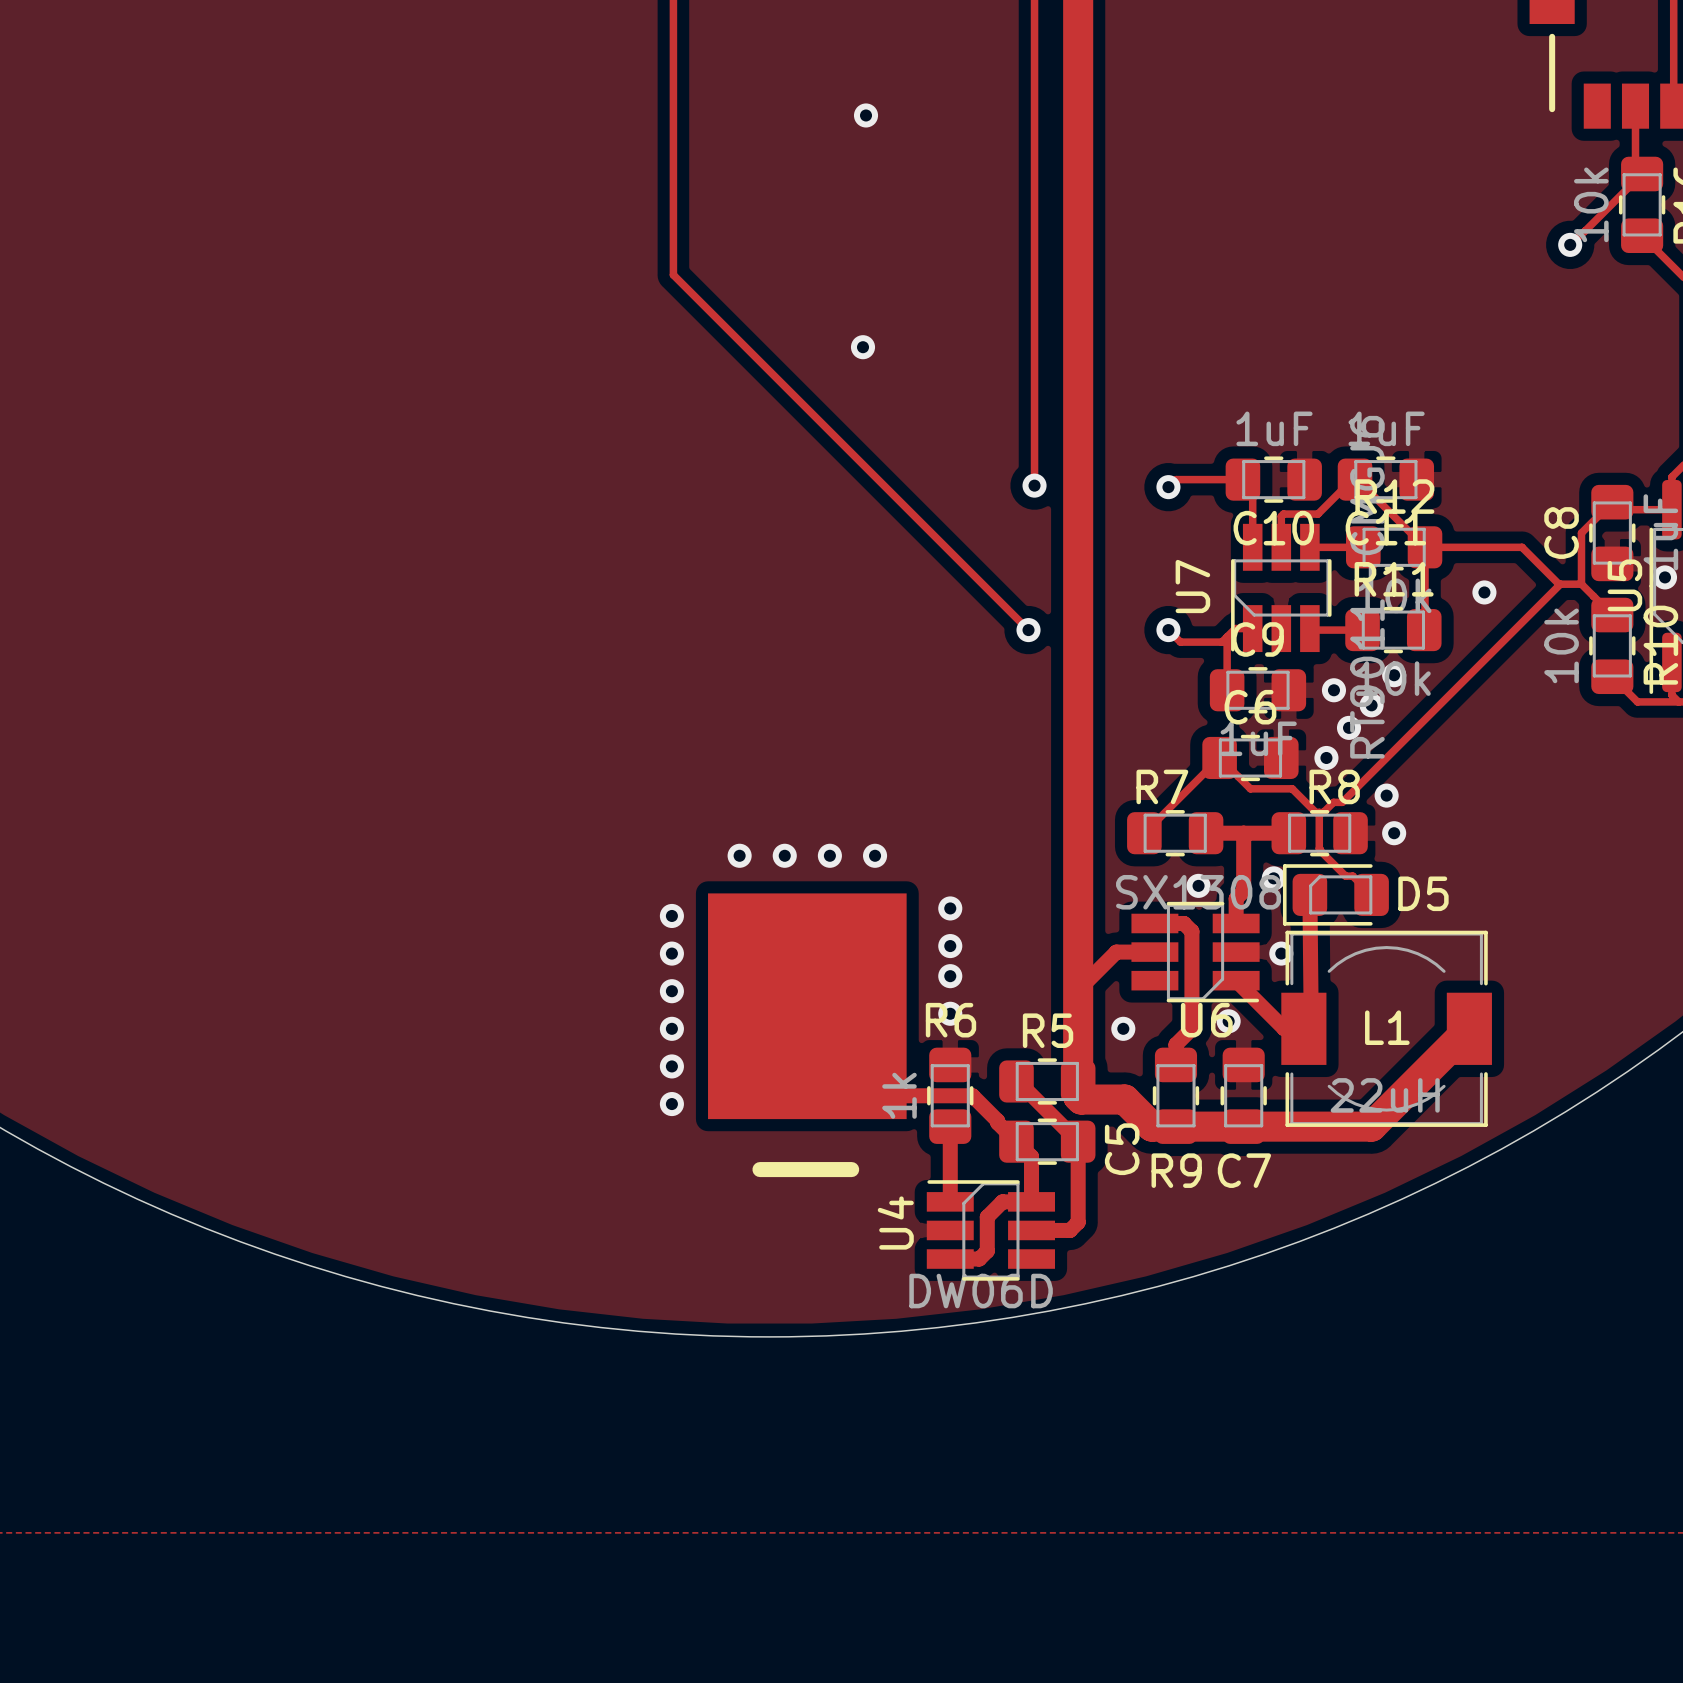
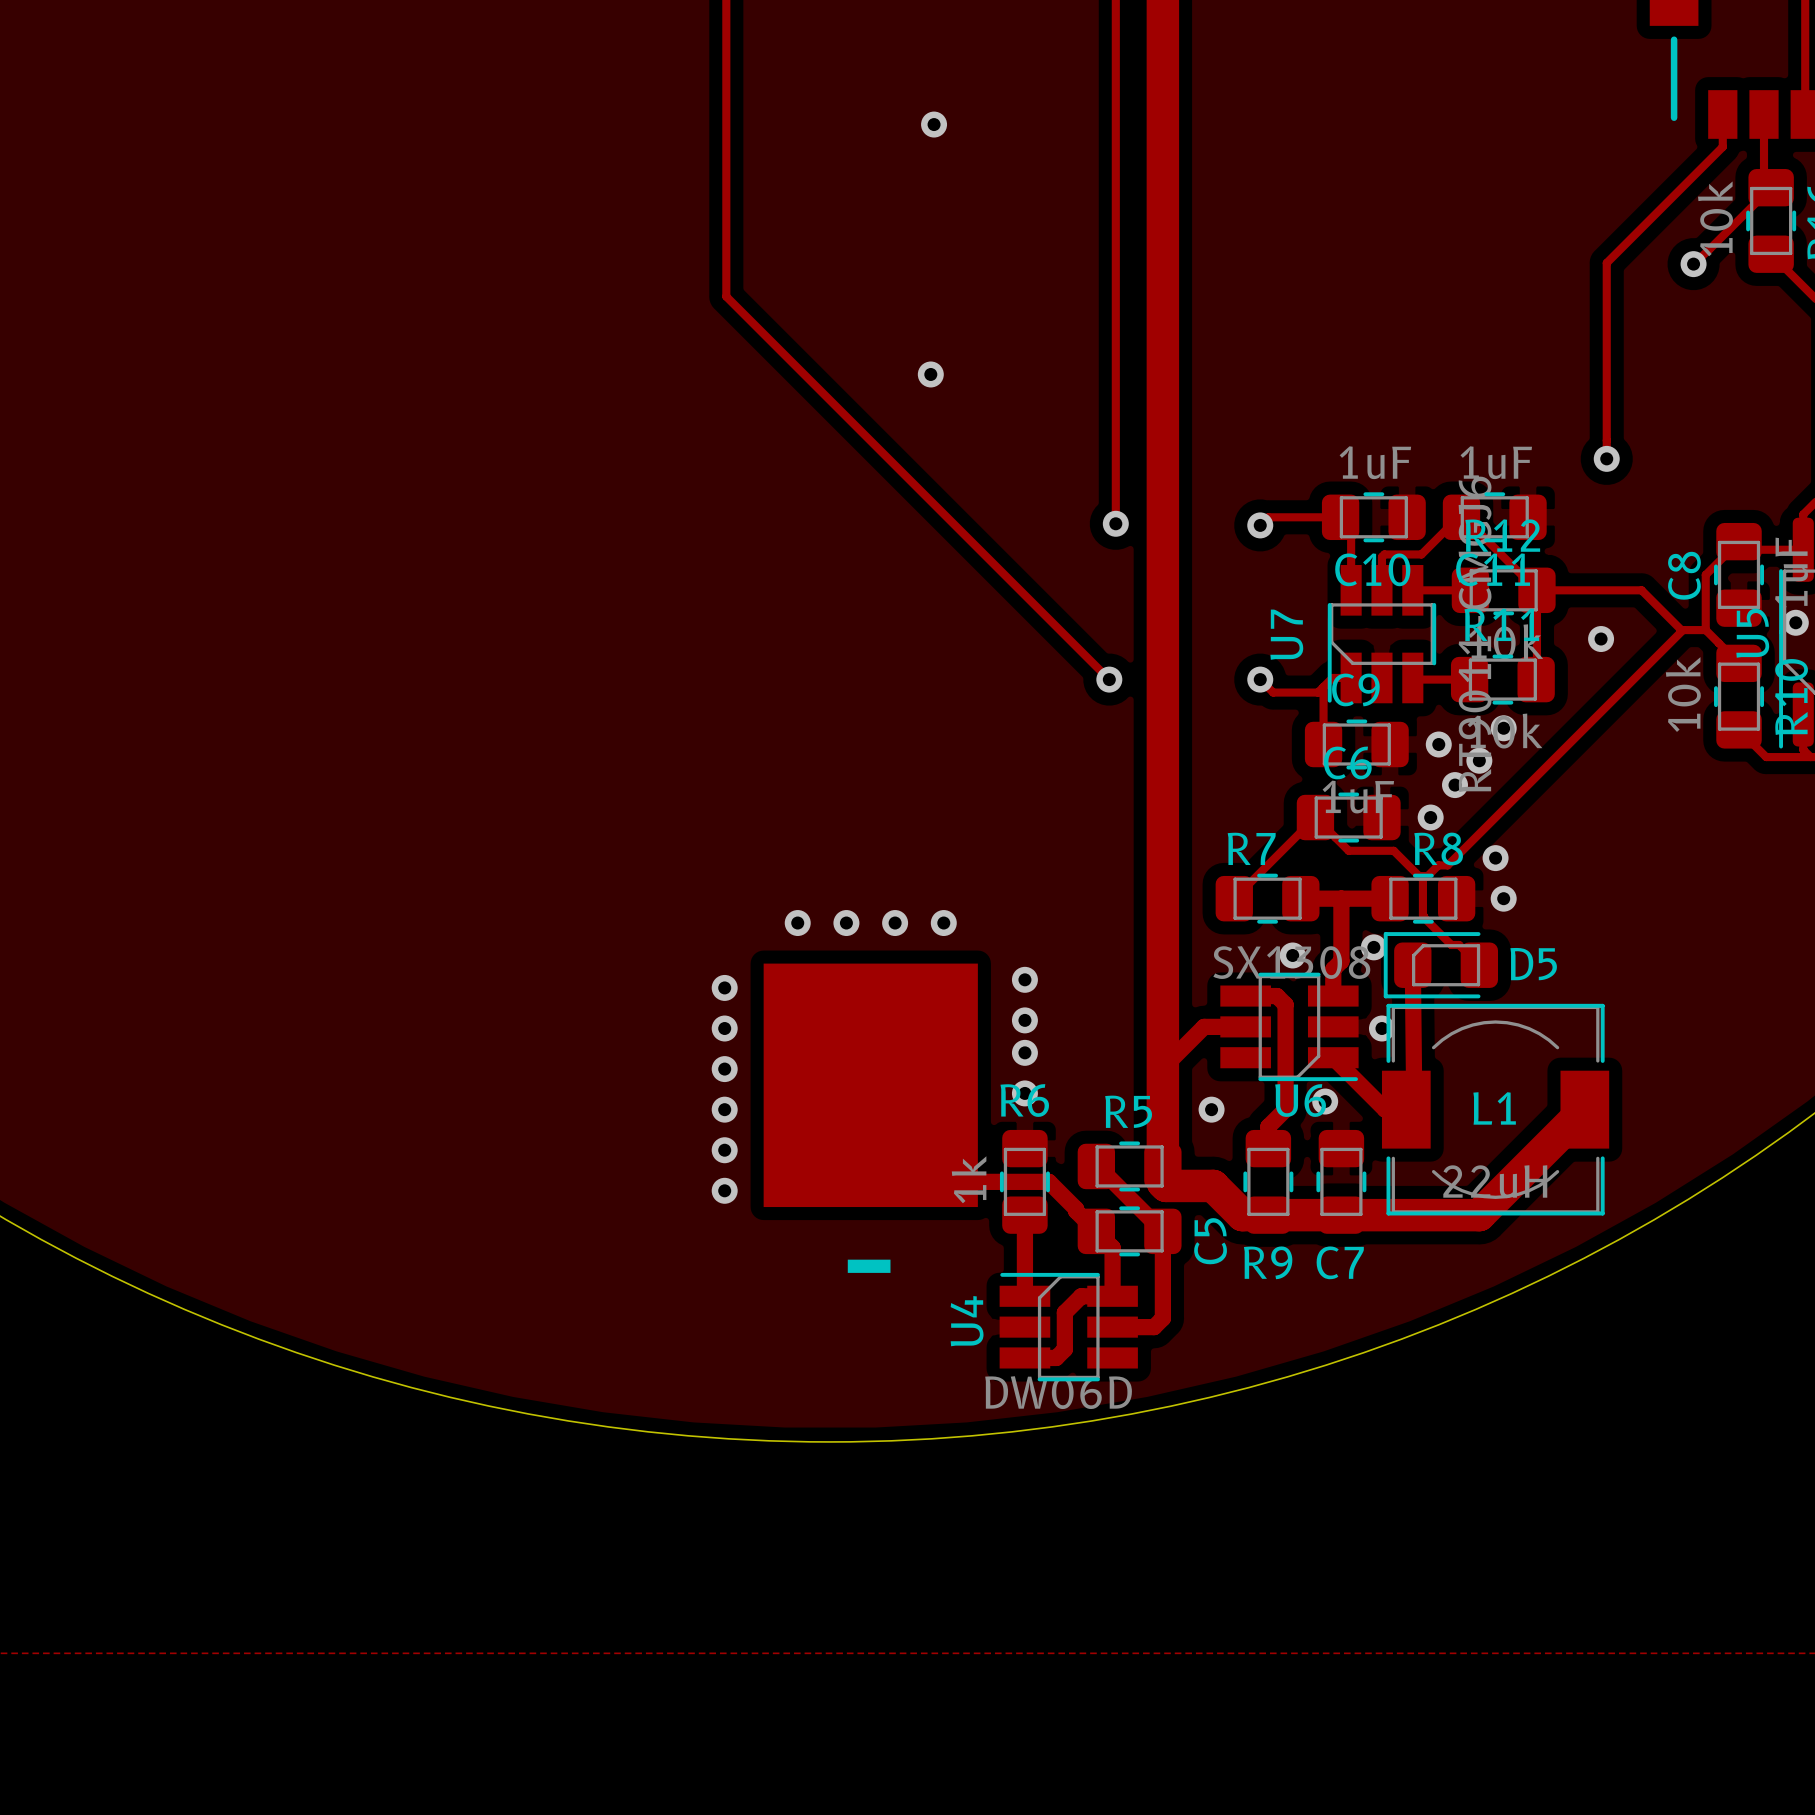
track: none -> (1722, 114) (1722, 146) (1606, 262) (1606, 458)
via: none -> (1606, 458)

